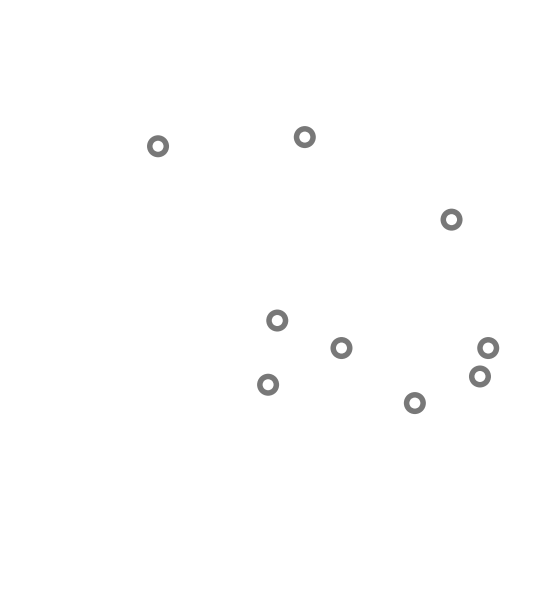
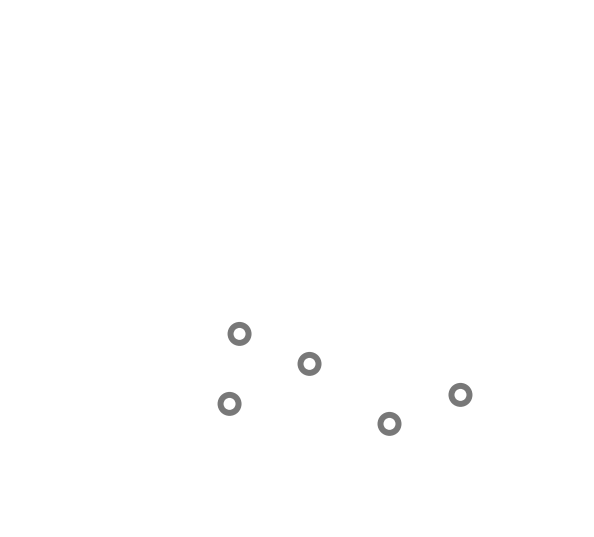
via: (304, 137) -> none
via: (158, 146) -> none
via: (451, 219) -> none
via: (488, 348) -> none

